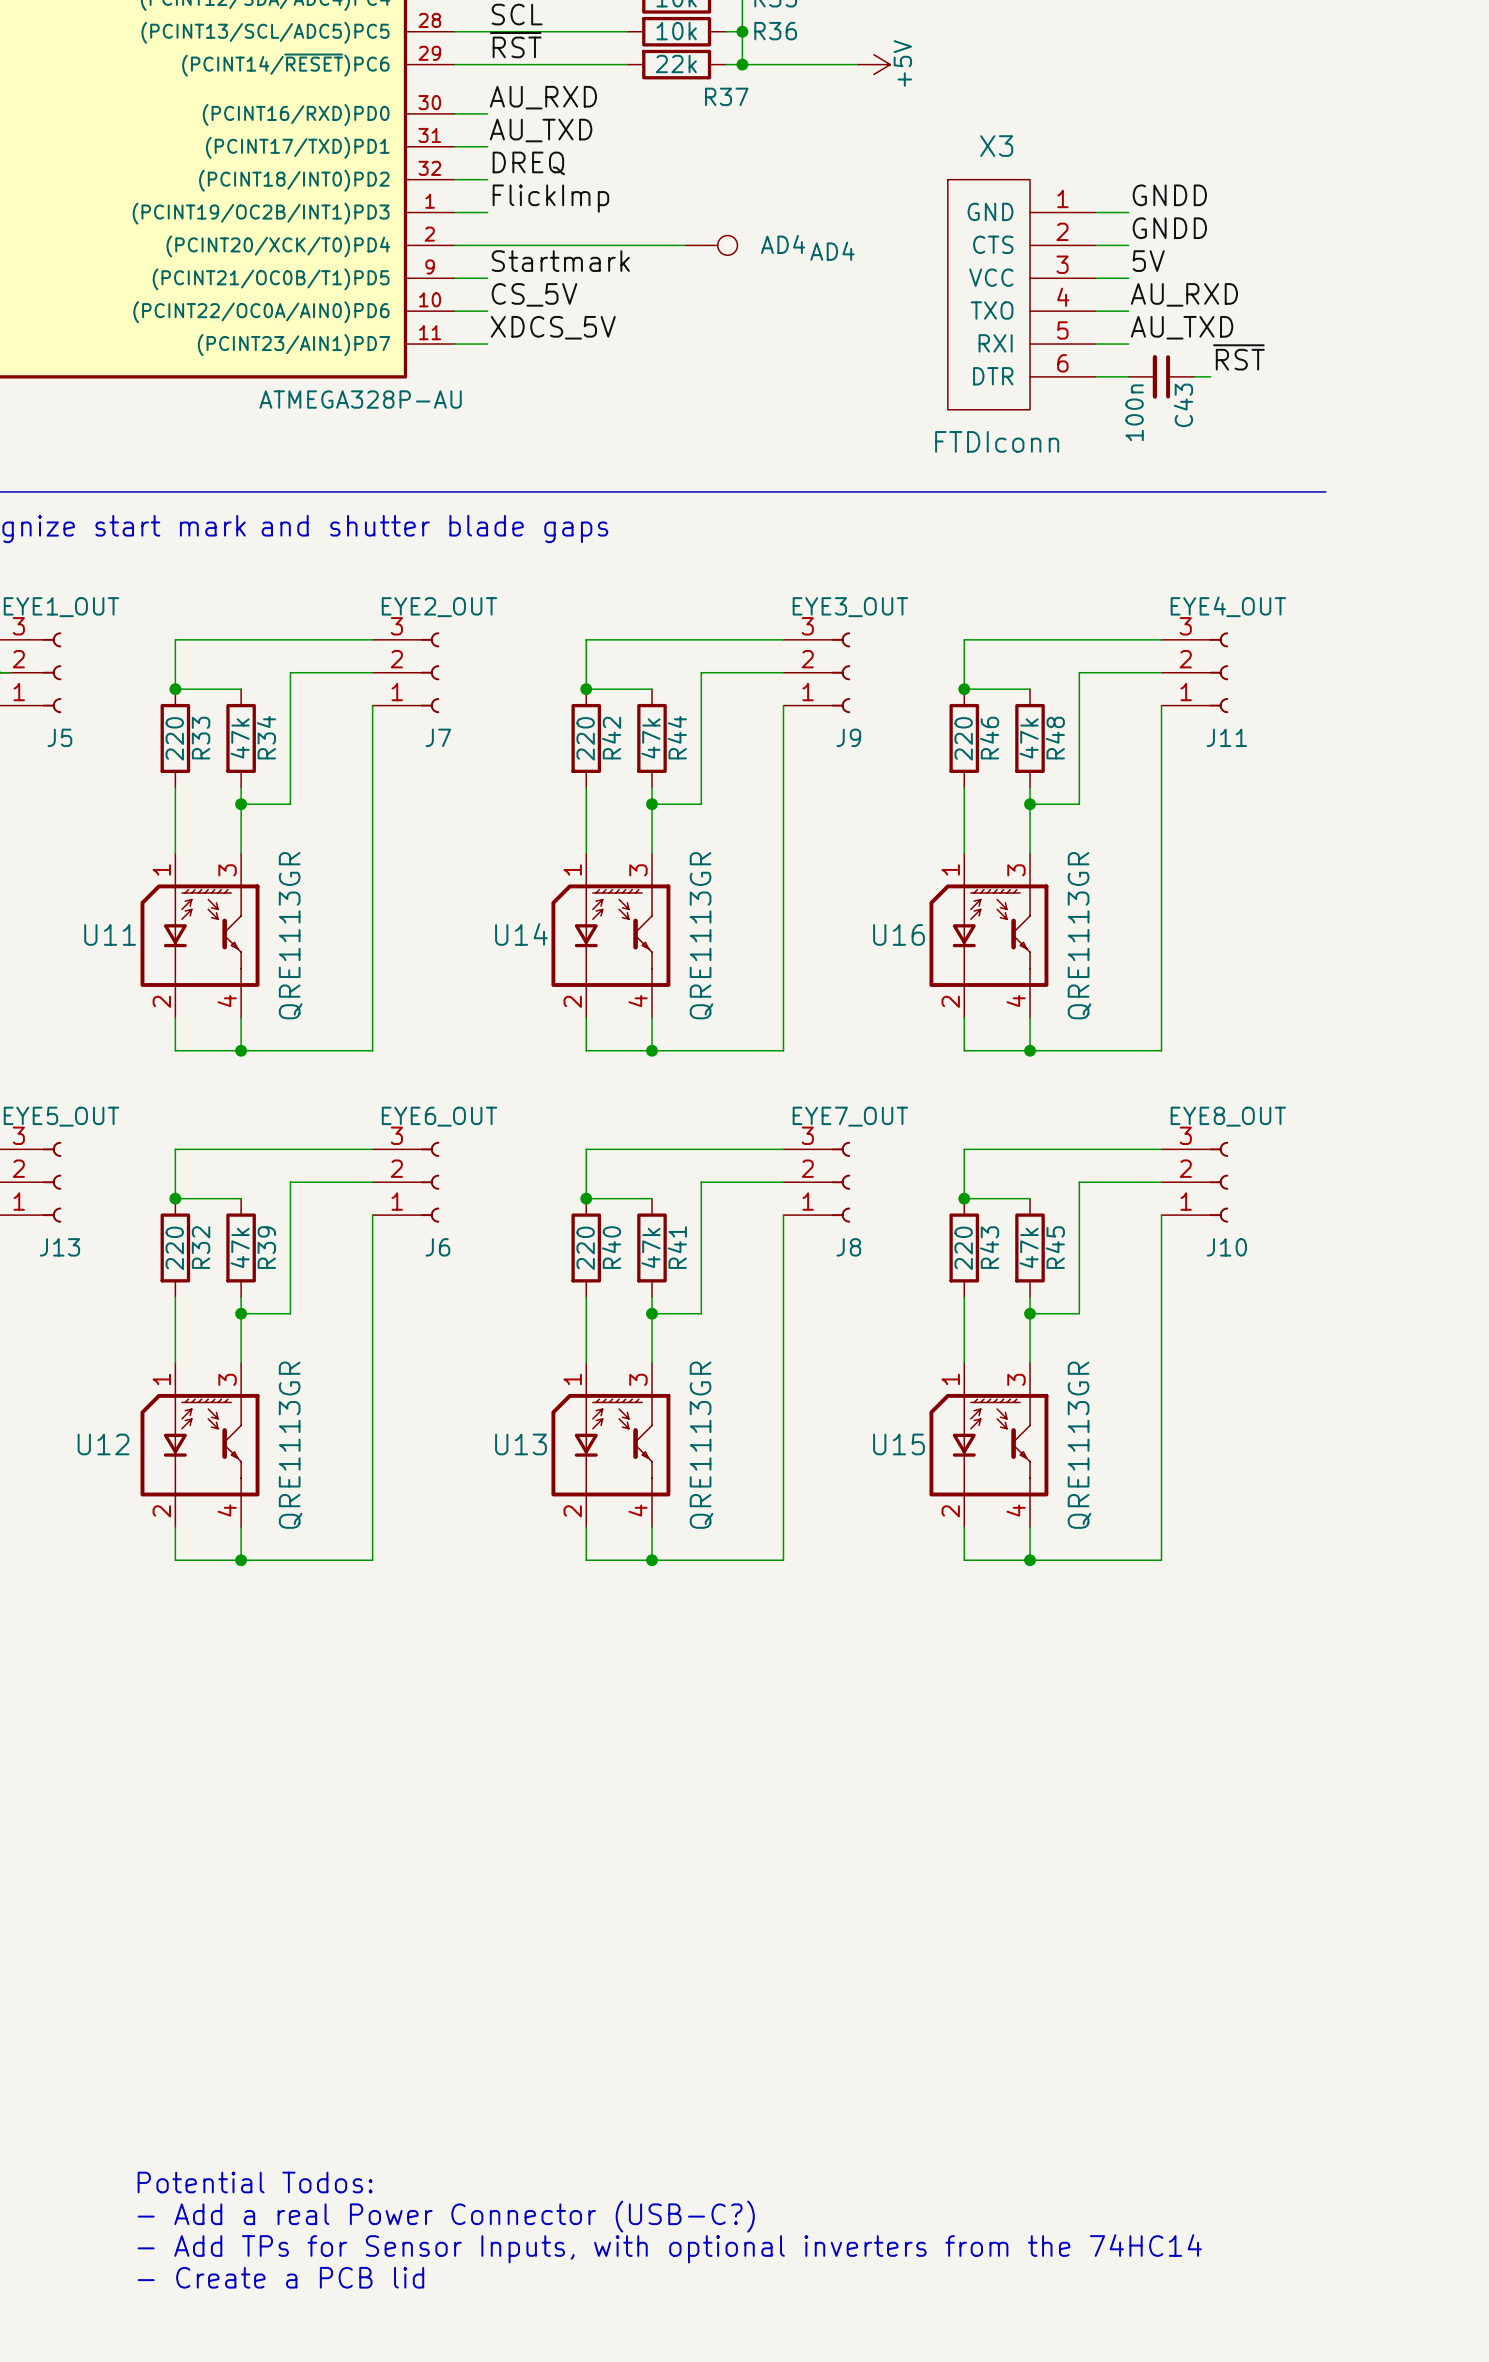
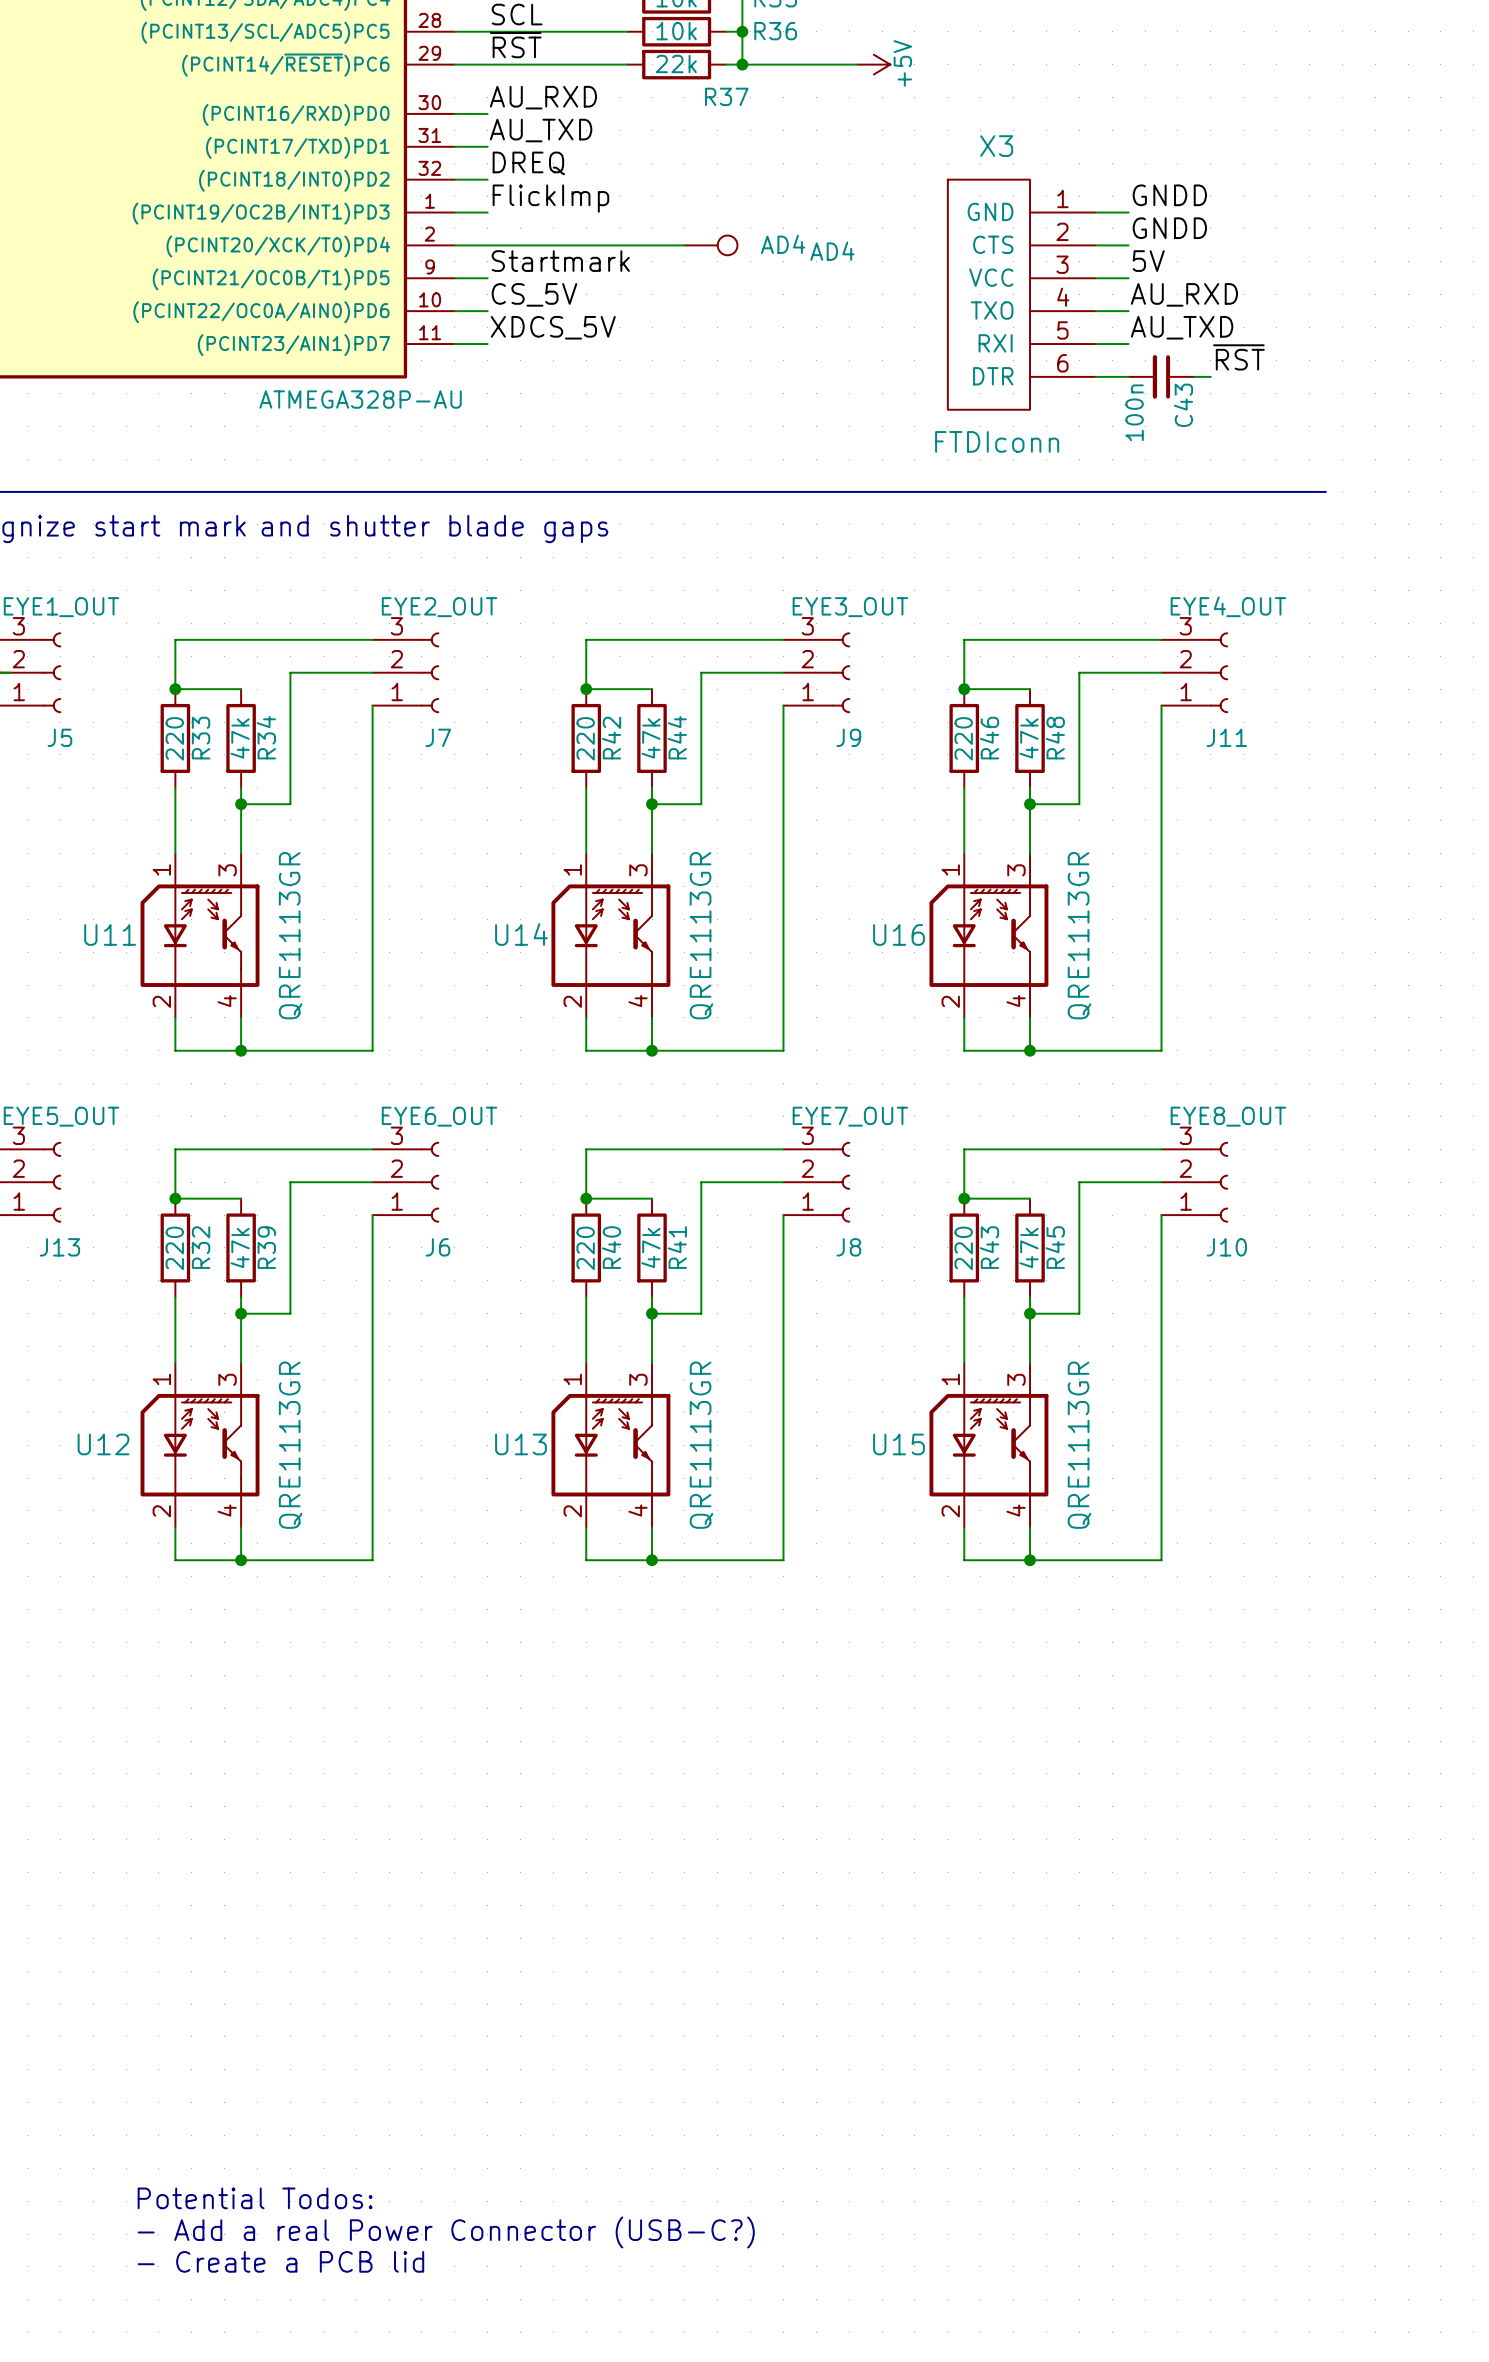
text position: Potential Todos: (255, 2182) -> Potential Todos: (255, 2198)
text position: - Add a real Power Connector (USB-C?) (446, 2216) -> - Add a real Power Connector (USB-C?) (446, 2232)
text: - Add TPs for Sensor Inputs, with optional inverters from the 74HC14 (669, 2248) -> none
text position: - Create a PCB lid (280, 2277) -> - Create a PCB lid (280, 2261)

